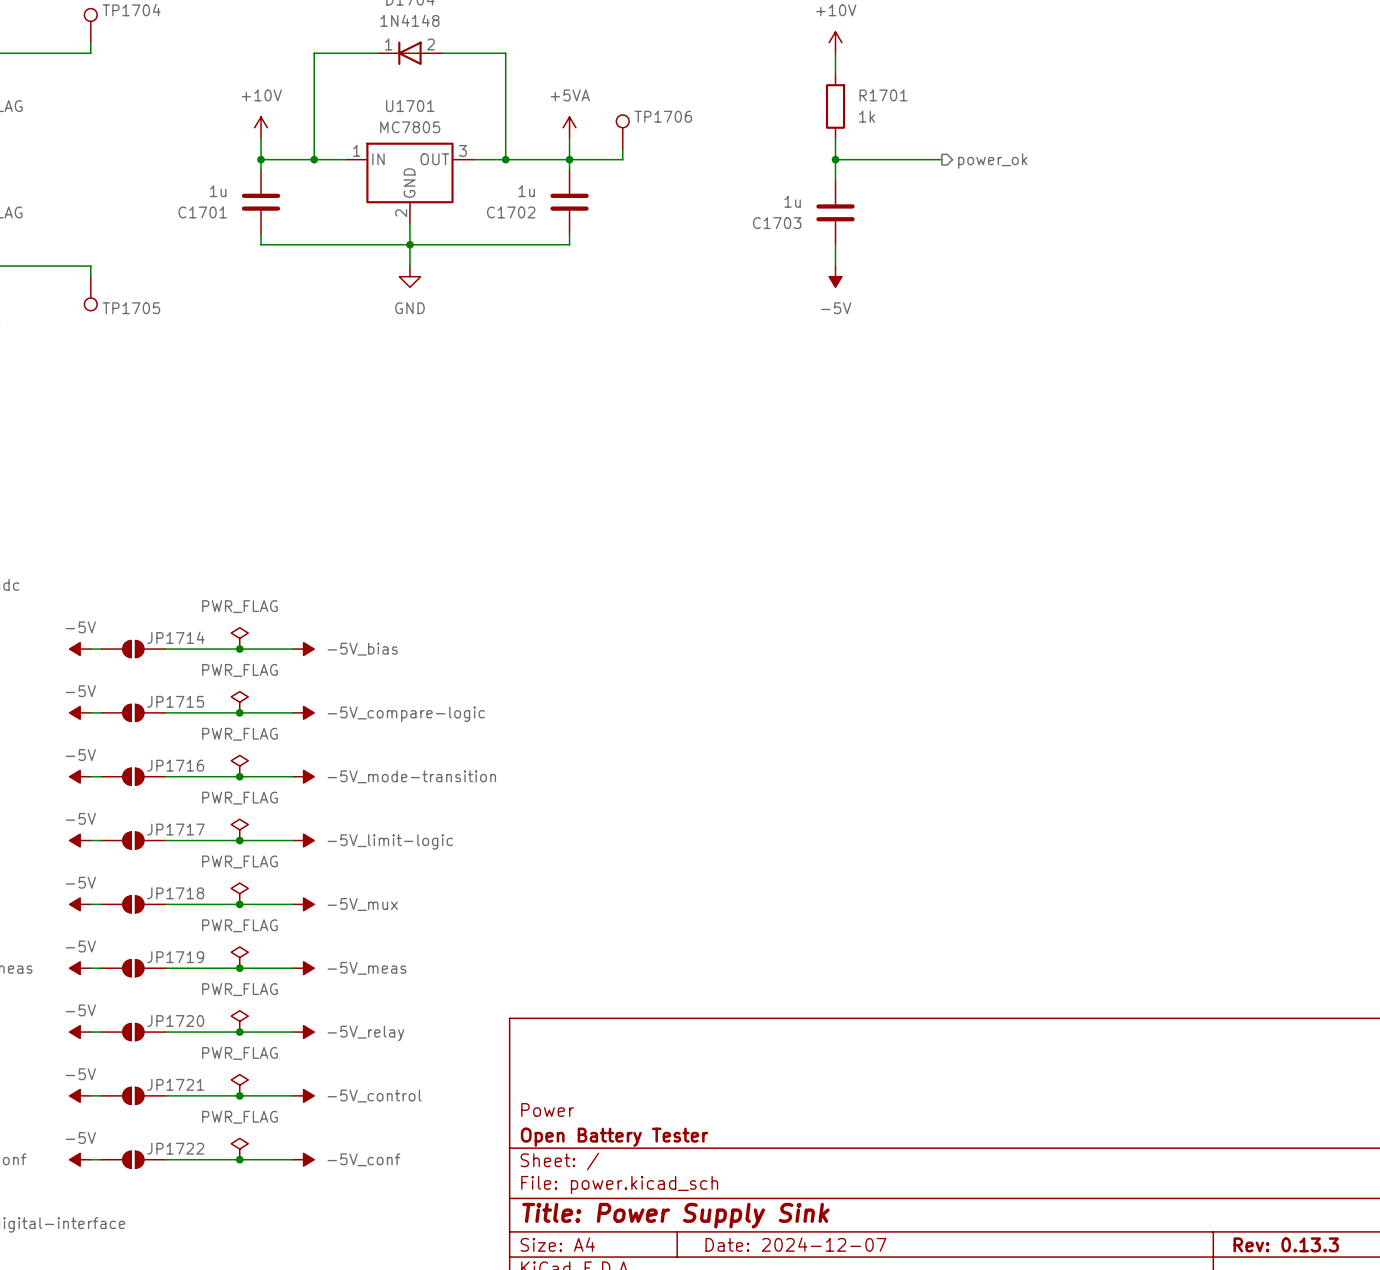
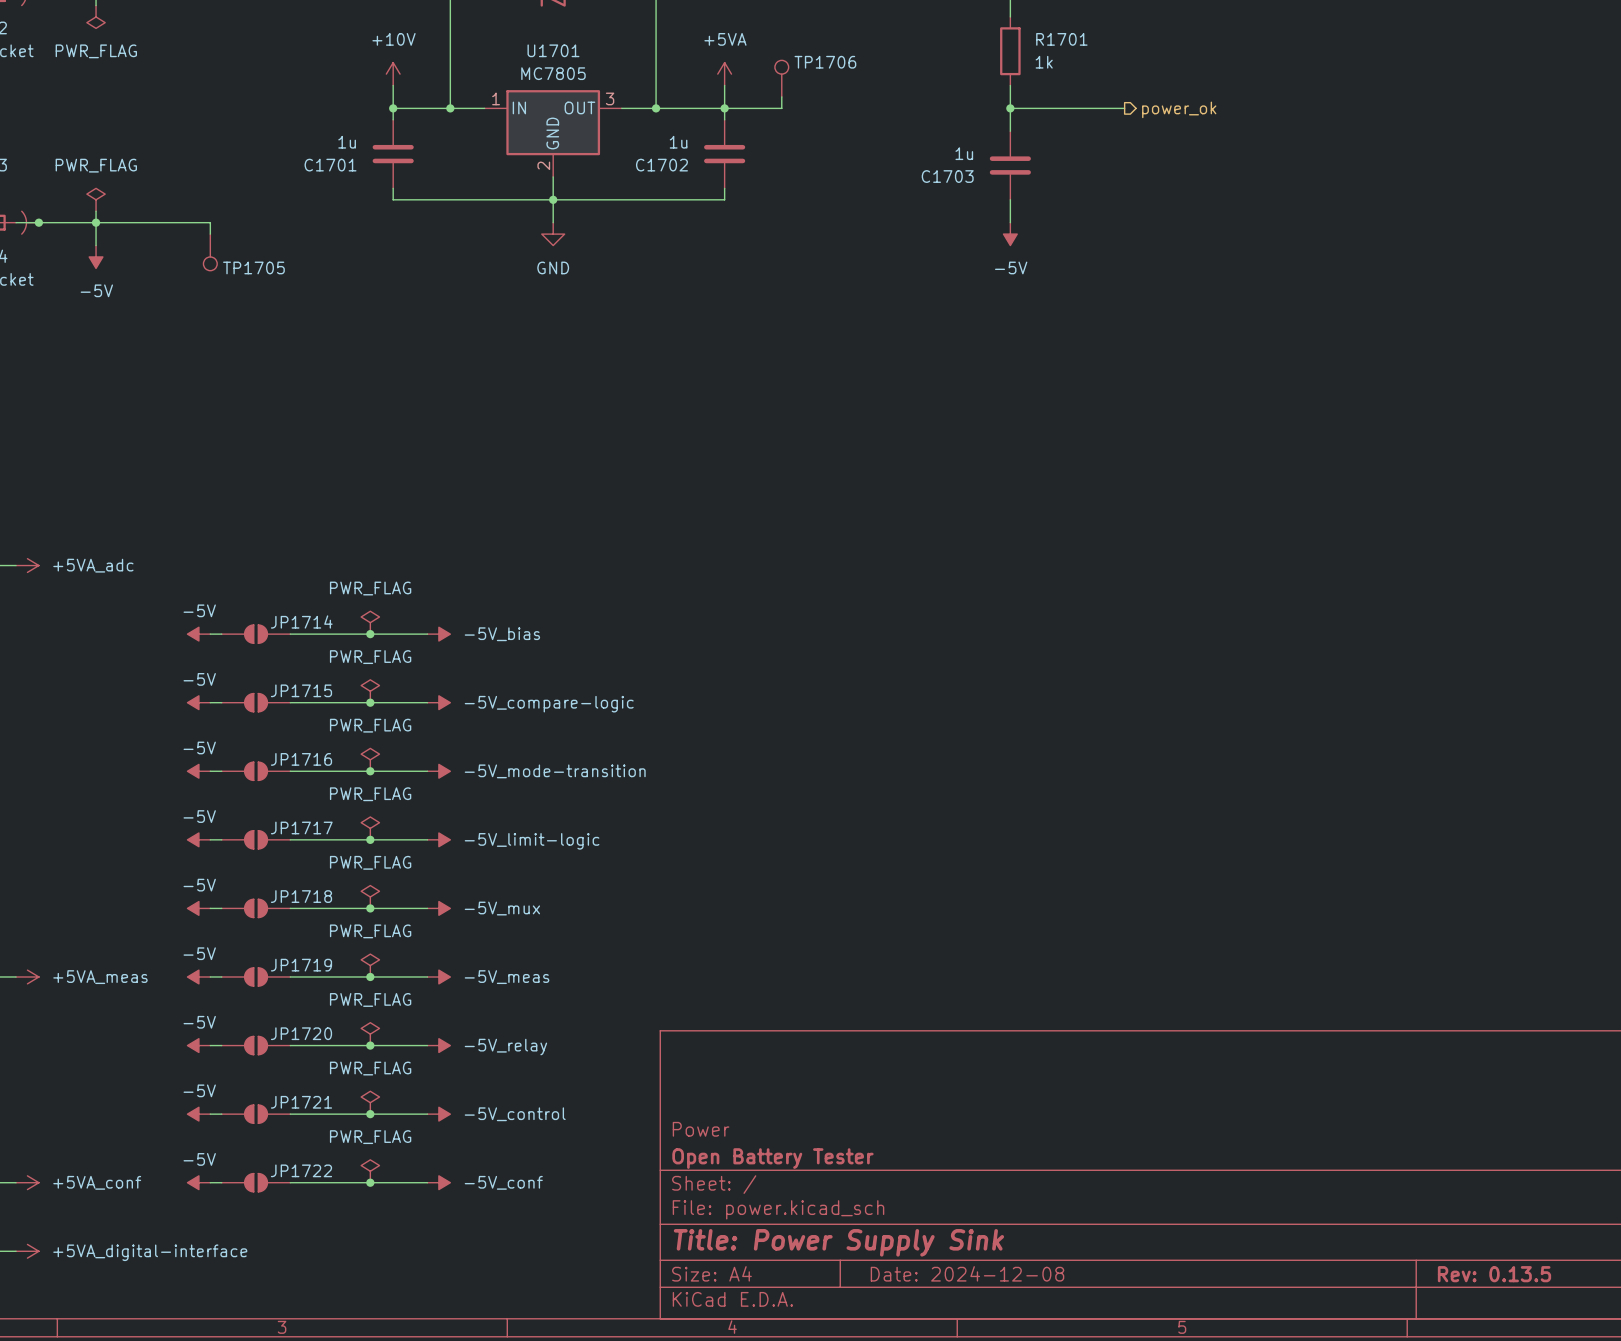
title block: Date: 2024-12-07 (795, 1244) -> Date: 2024-12-08 (967, 1273)
title block: Rev: 0.13.3 (1286, 1244) -> Rev: 0.13.5 (1494, 1274)

